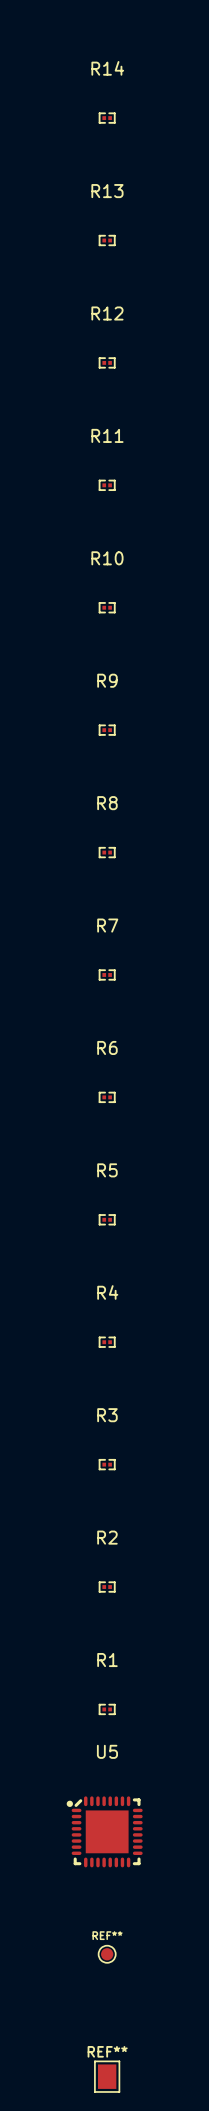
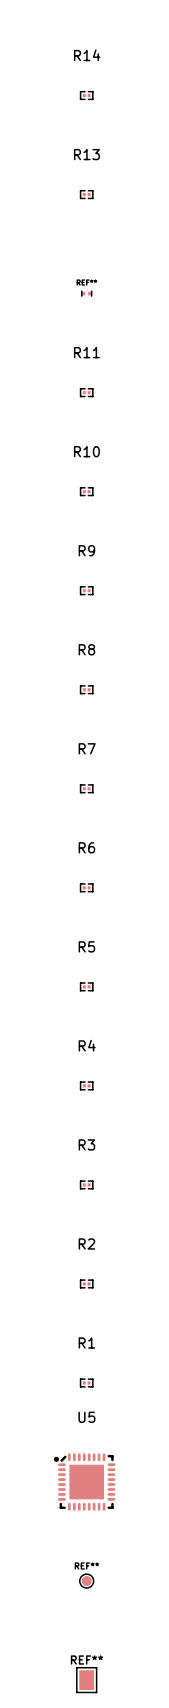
R12: (107, 362) -> none
part: none -> (86, 293)

